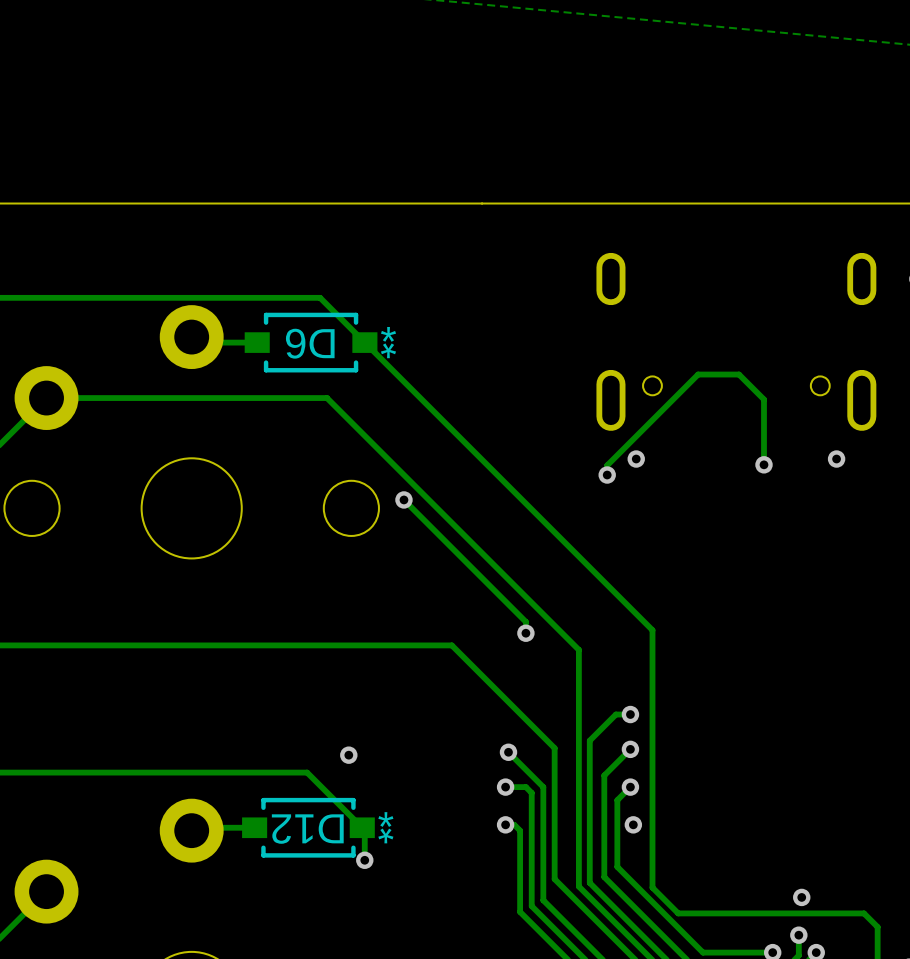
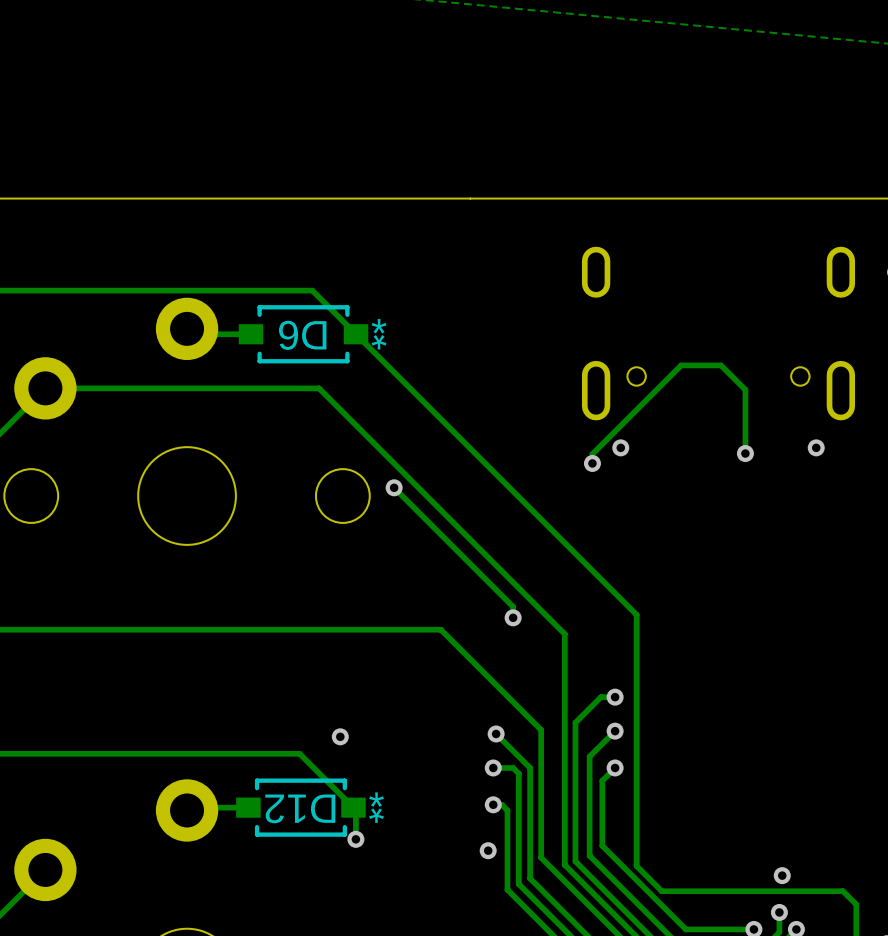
via position: (633, 824) -> (488, 850)

